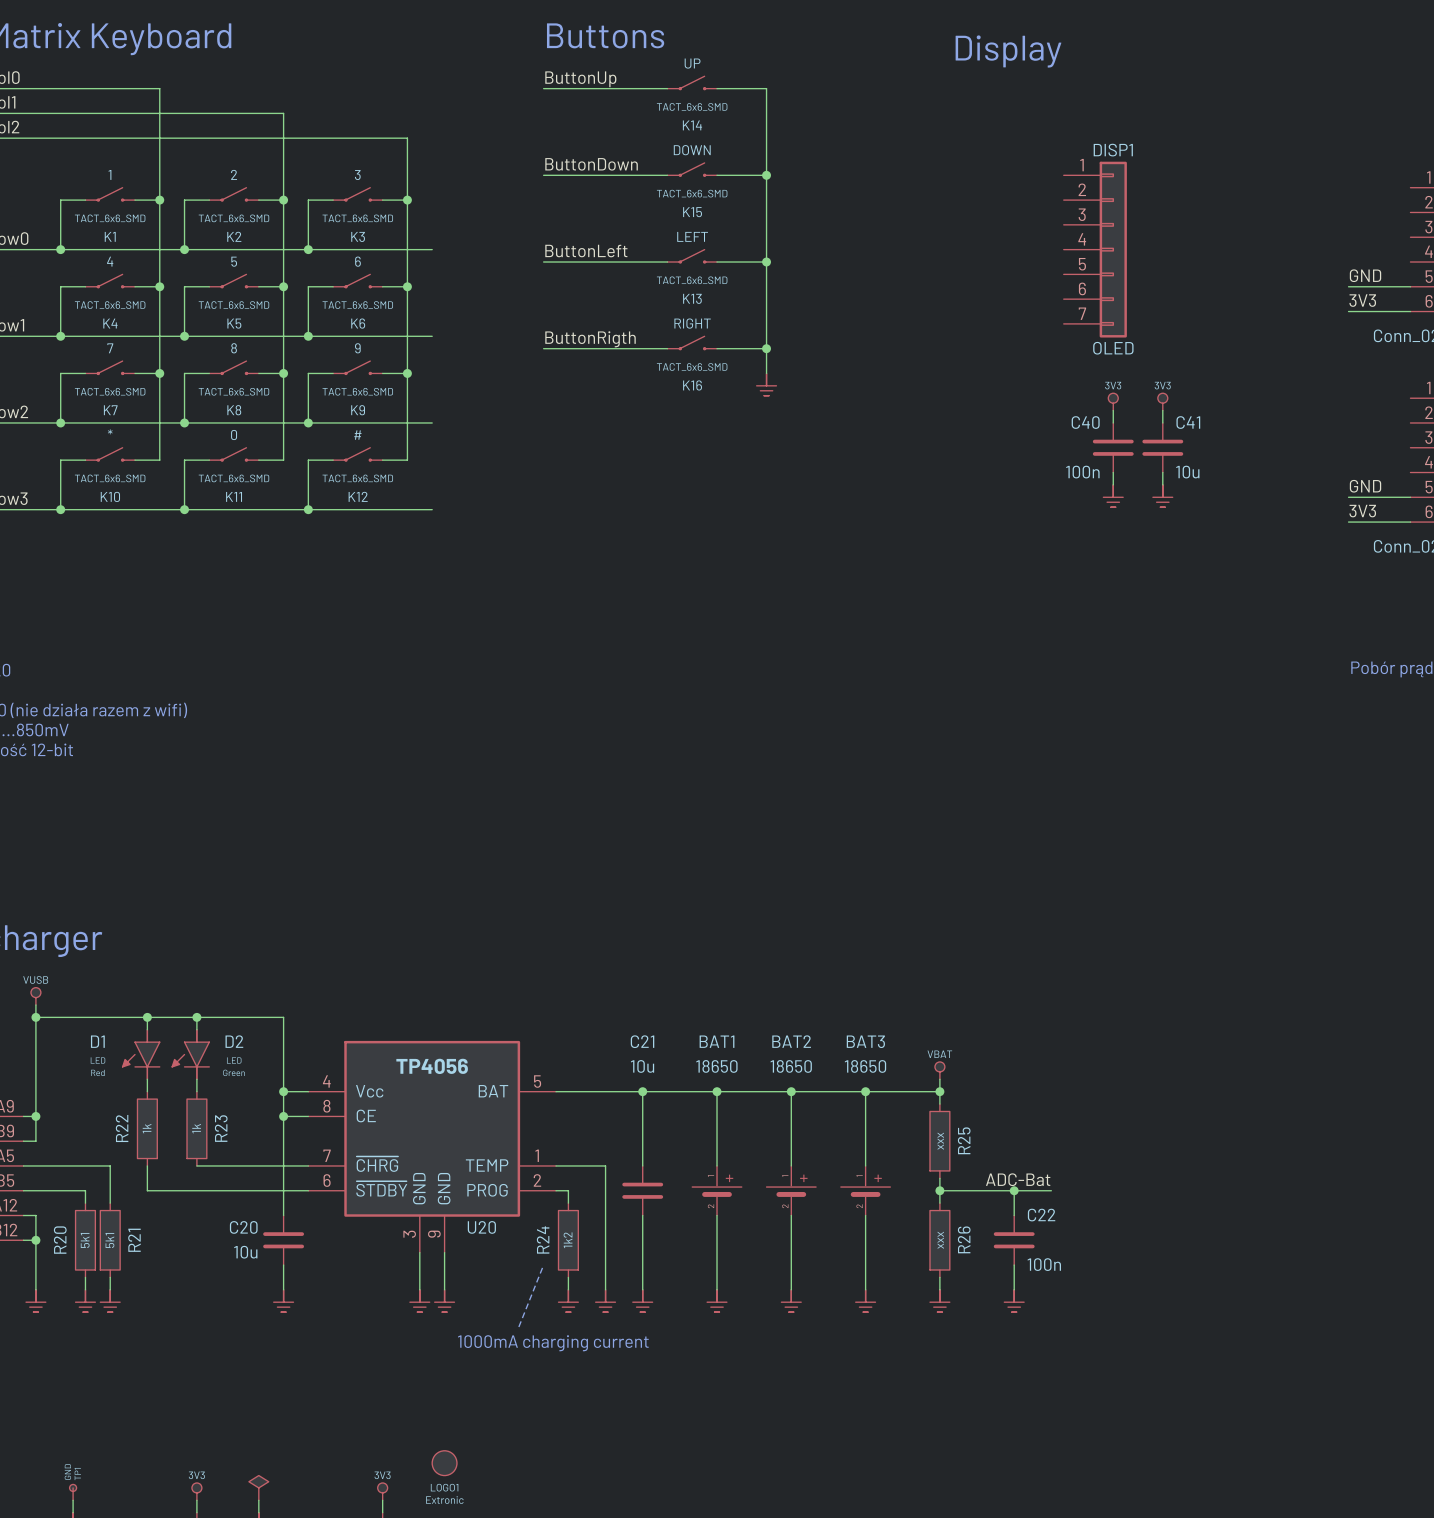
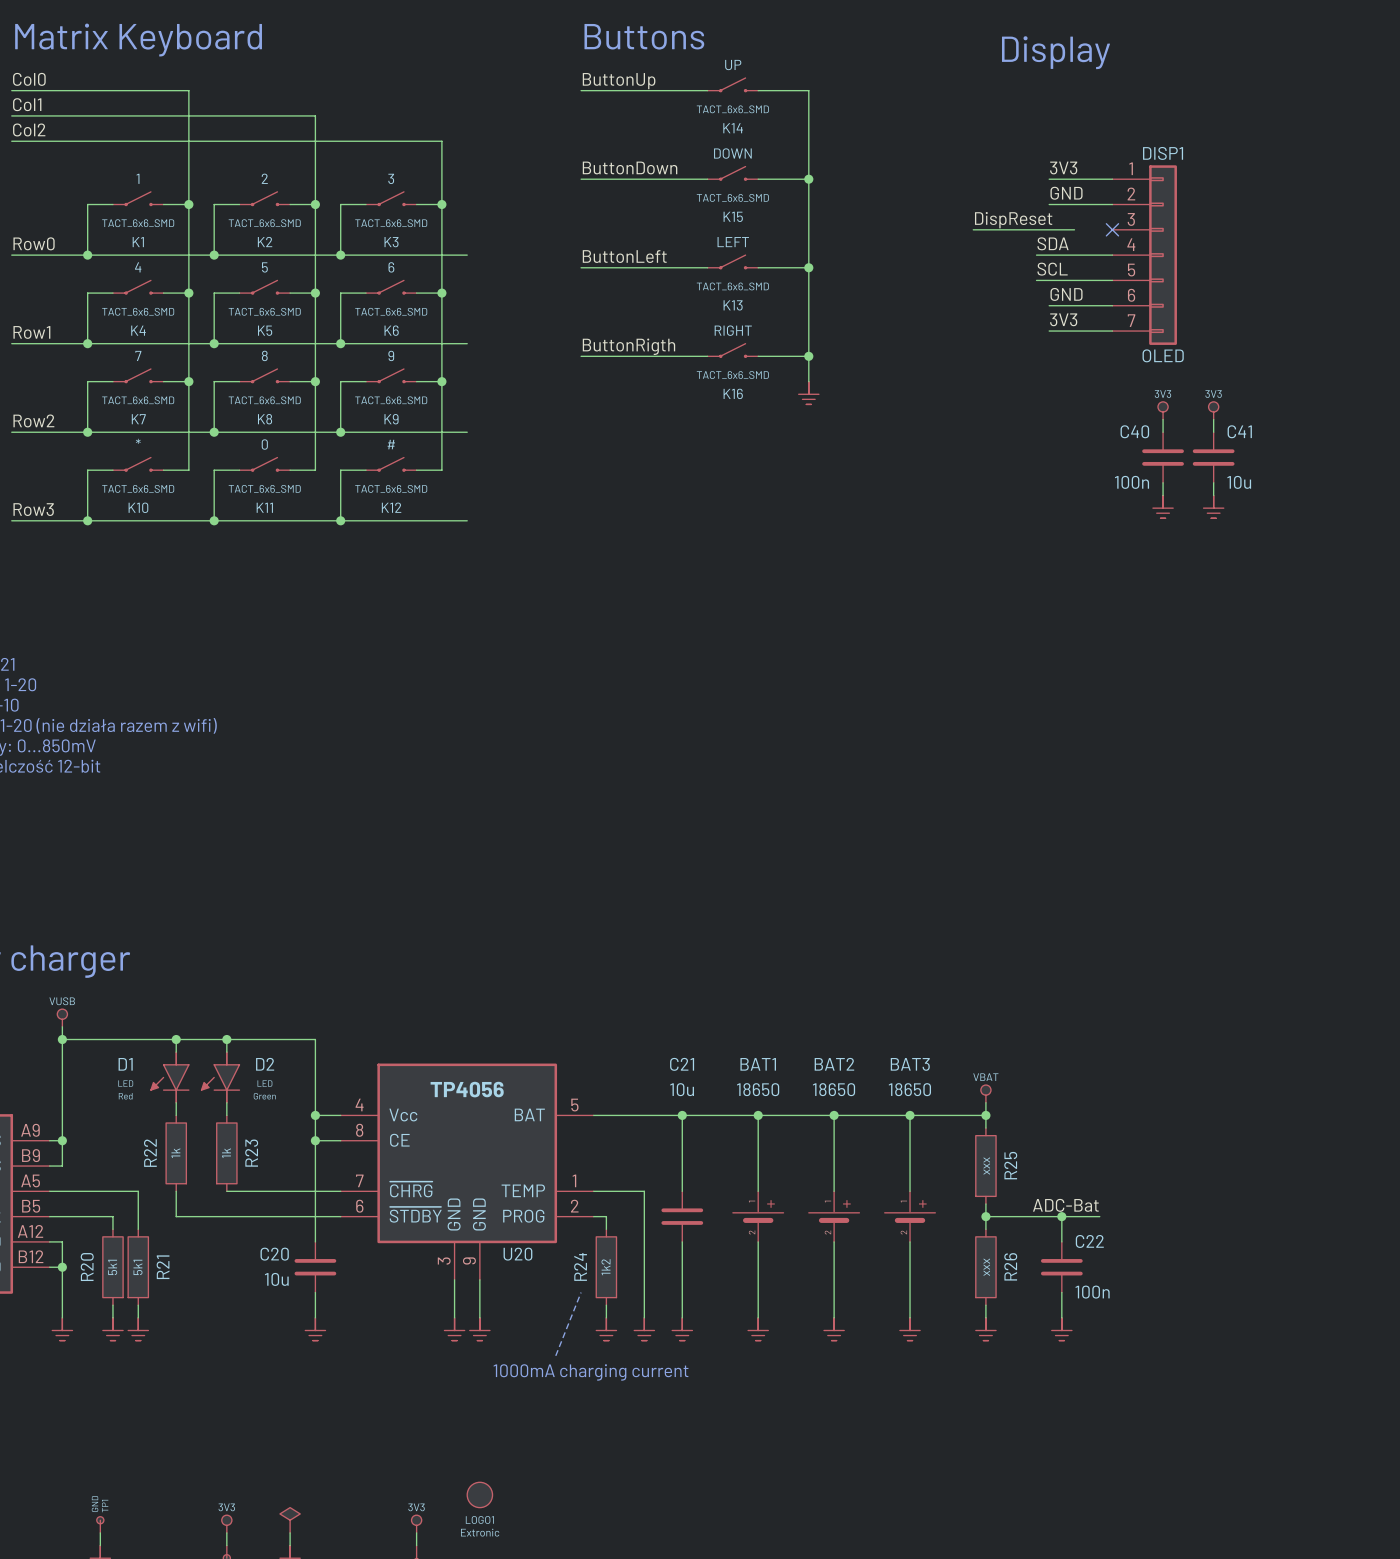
label: none -> 3V3 (1063, 167)
wire: none -> (1049, 179) (1112, 179)
label: none -> GND (1066, 193)
wire: none -> (1049, 204) (1112, 204)
label: none -> DispReset (1013, 220)
wire: none -> (973, 229) (1074, 229)
no-connect mark: none -> (1112, 229)
label: none -> SDA (1053, 243)
wire: none -> (1036, 255) (1112, 255)
label: none -> SCL (1052, 269)
wire: none -> (1036, 280) (1112, 280)
label: none -> GND (1066, 294)
wire: none -> (1049, 305) (1112, 305)
label: none -> 3V3 (1063, 319)
wire: none -> (1049, 331) (1112, 331)

